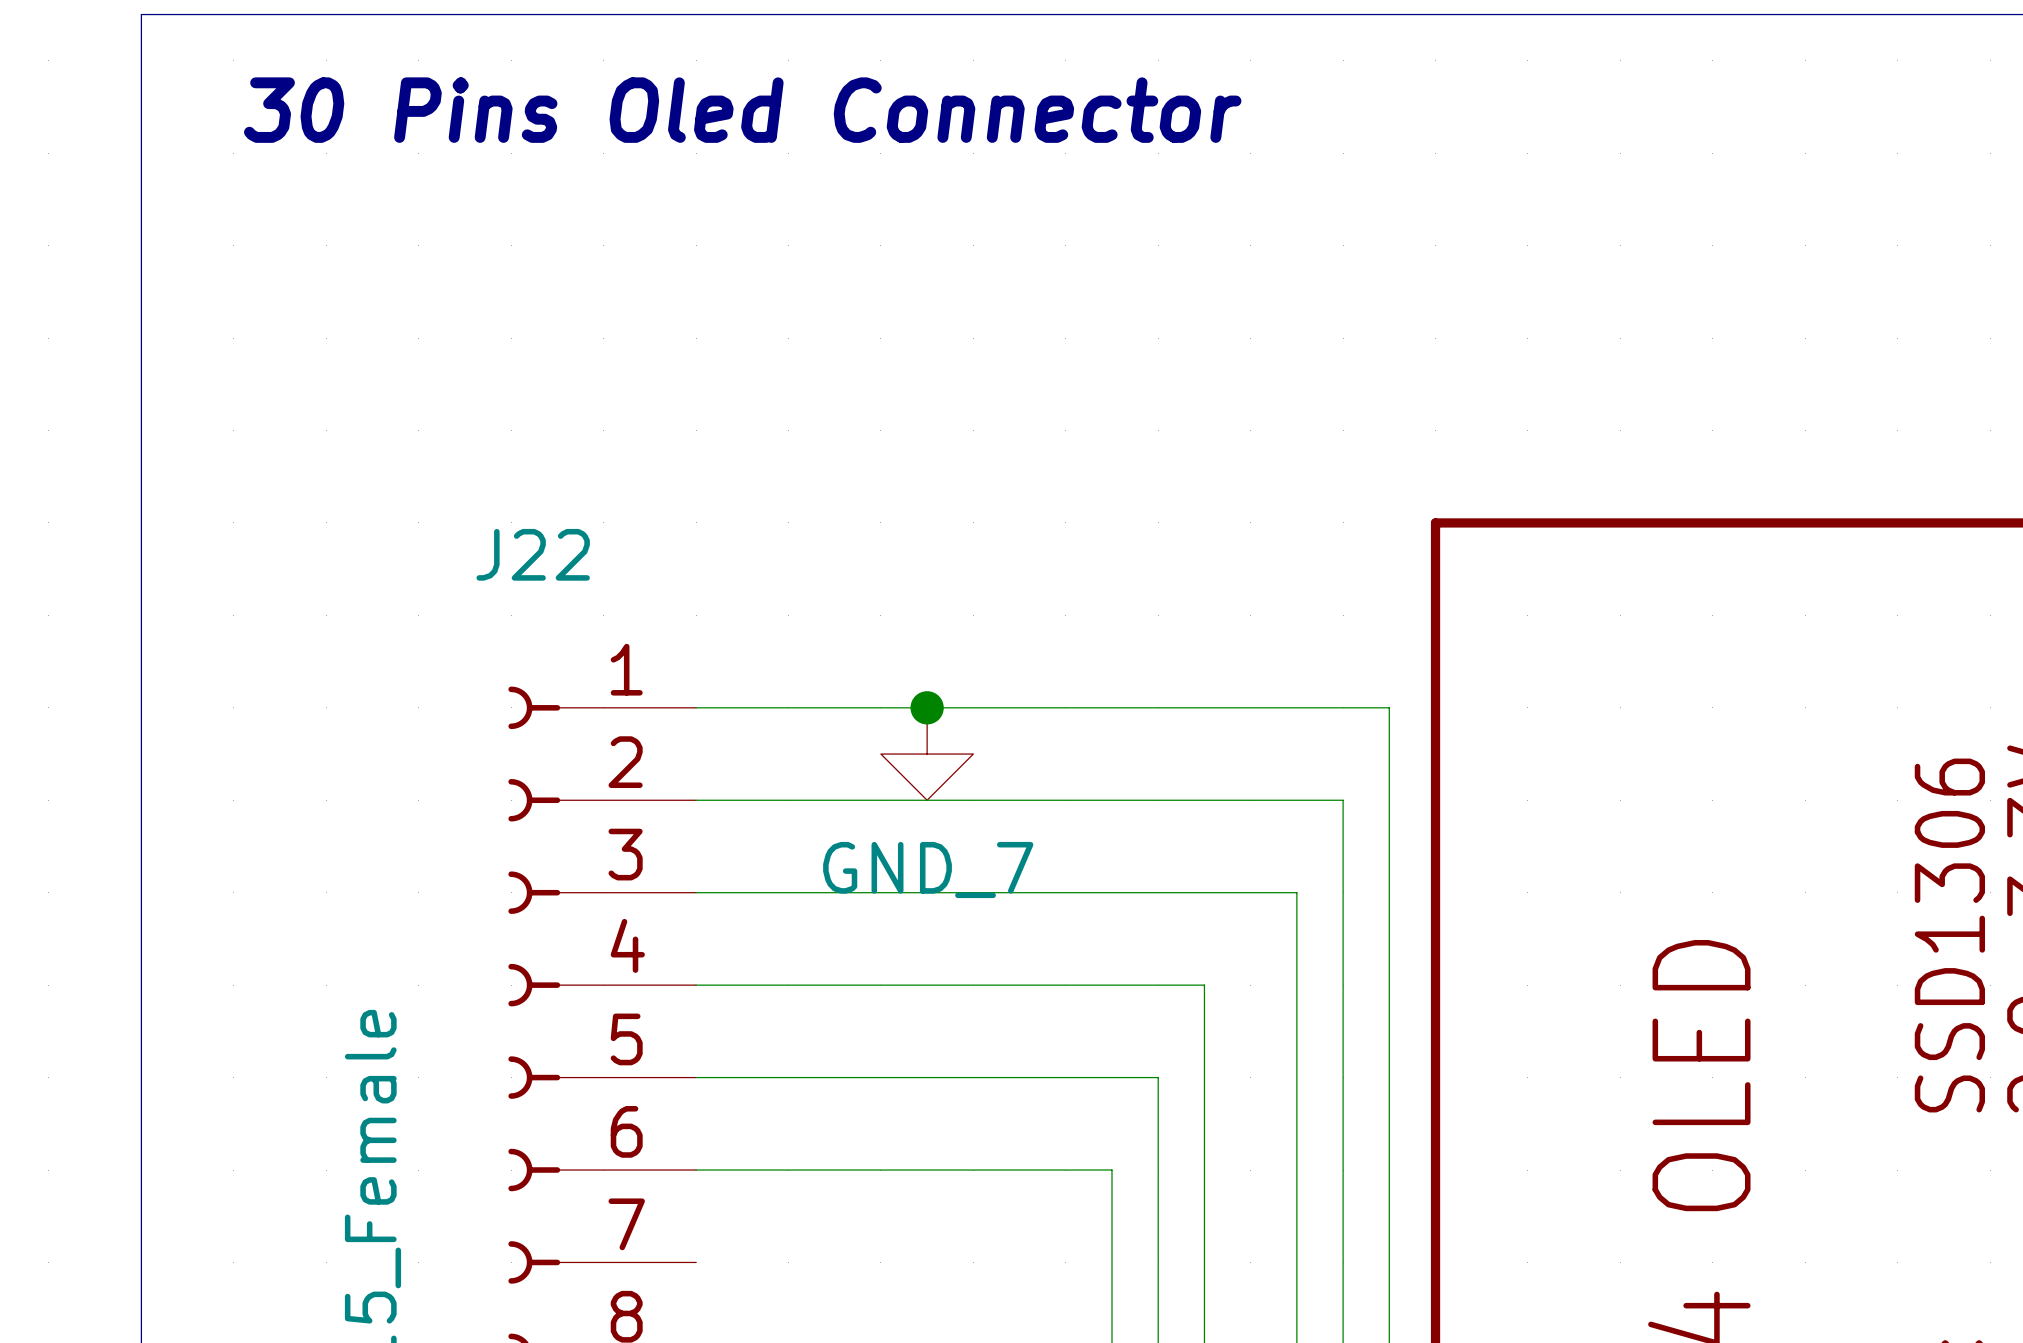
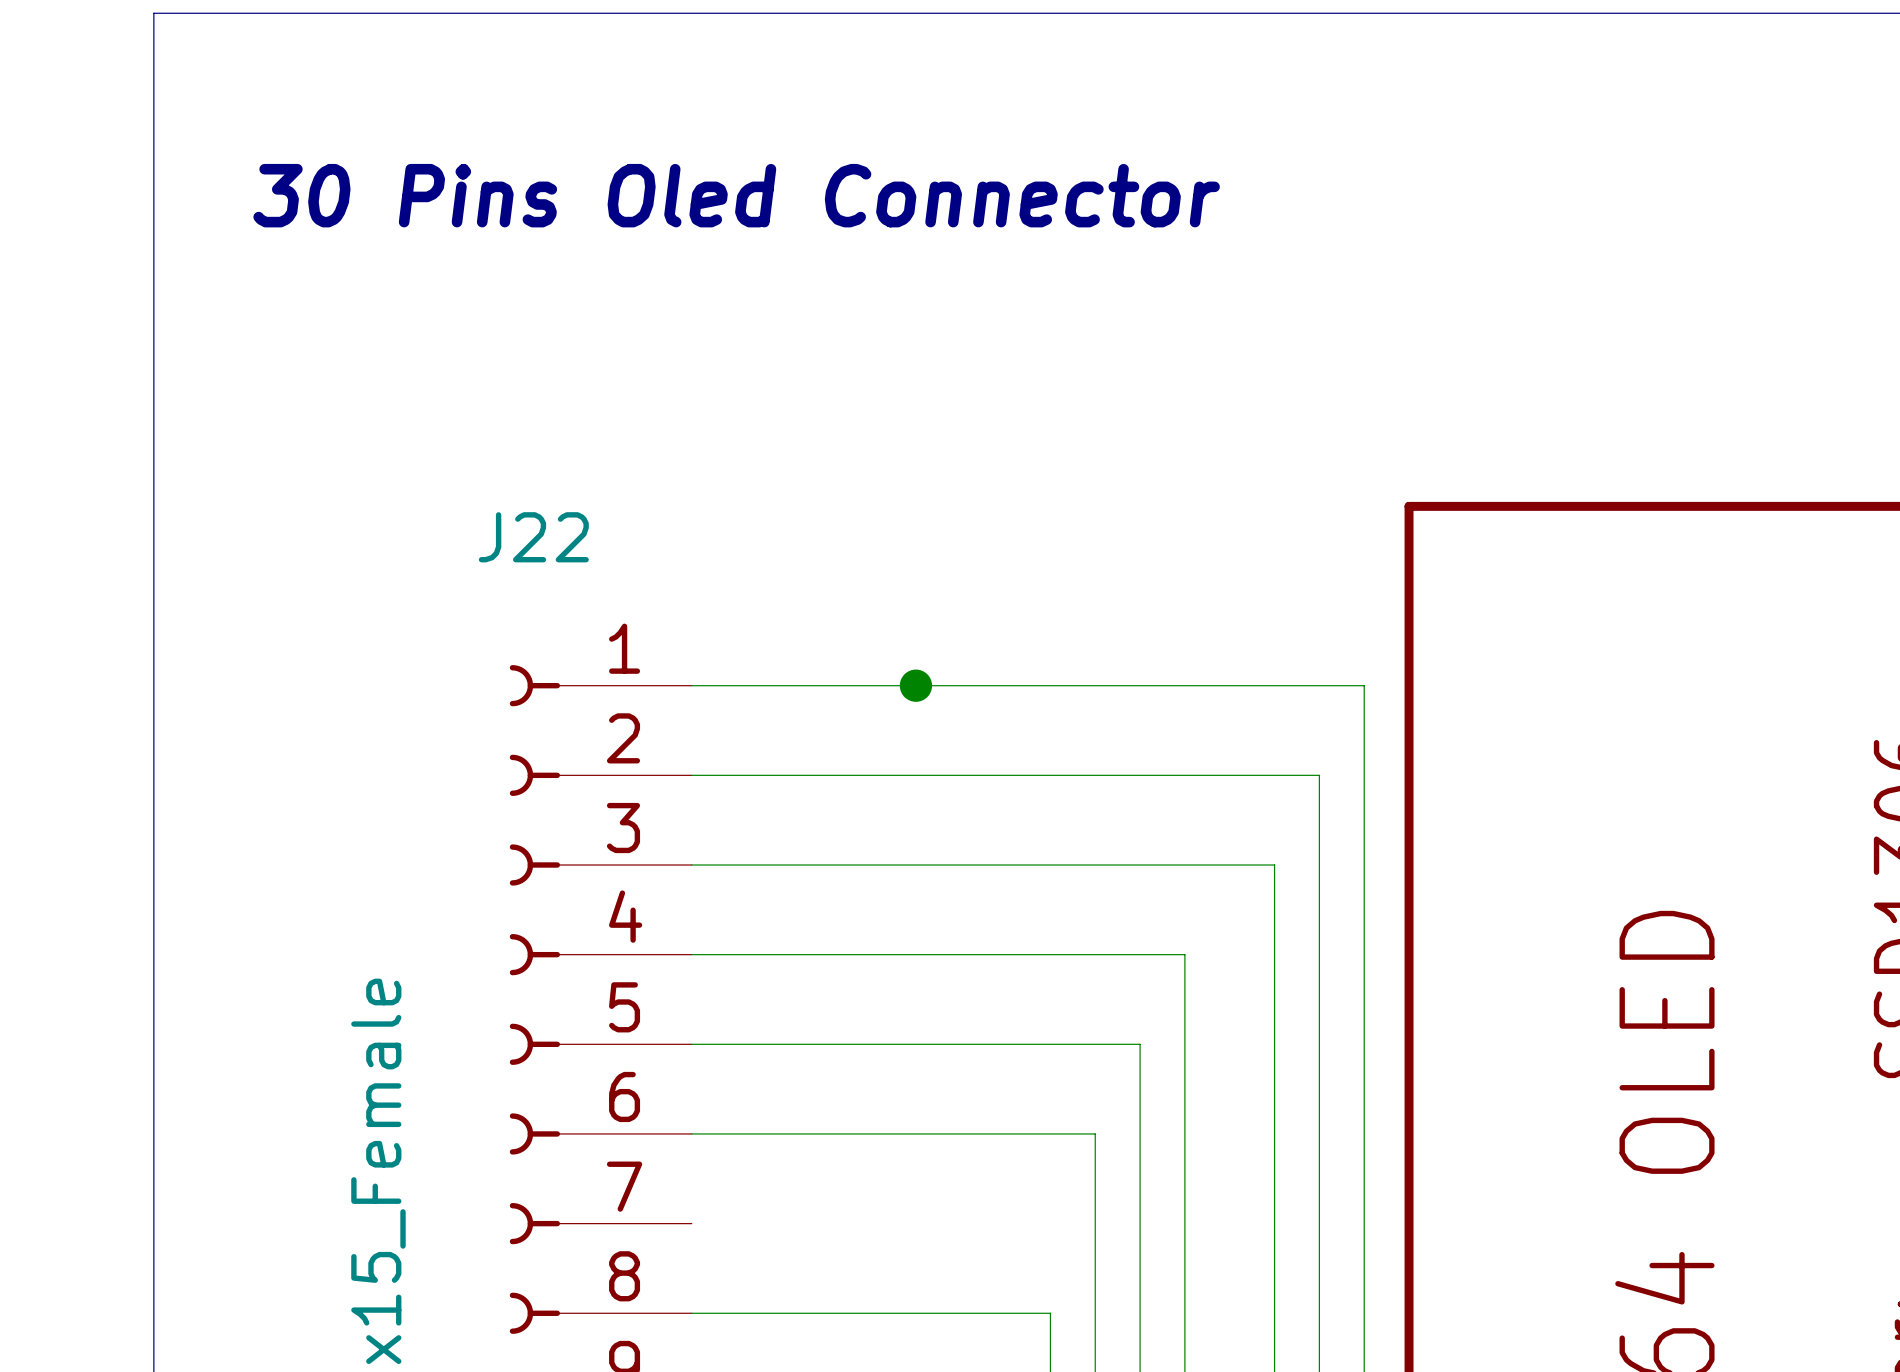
text position: 30 Pins Oled Connector (742, 110) -> 30 Pins Oled Connector (736, 195)
power symbol: GND_7 (927, 754) -> none

